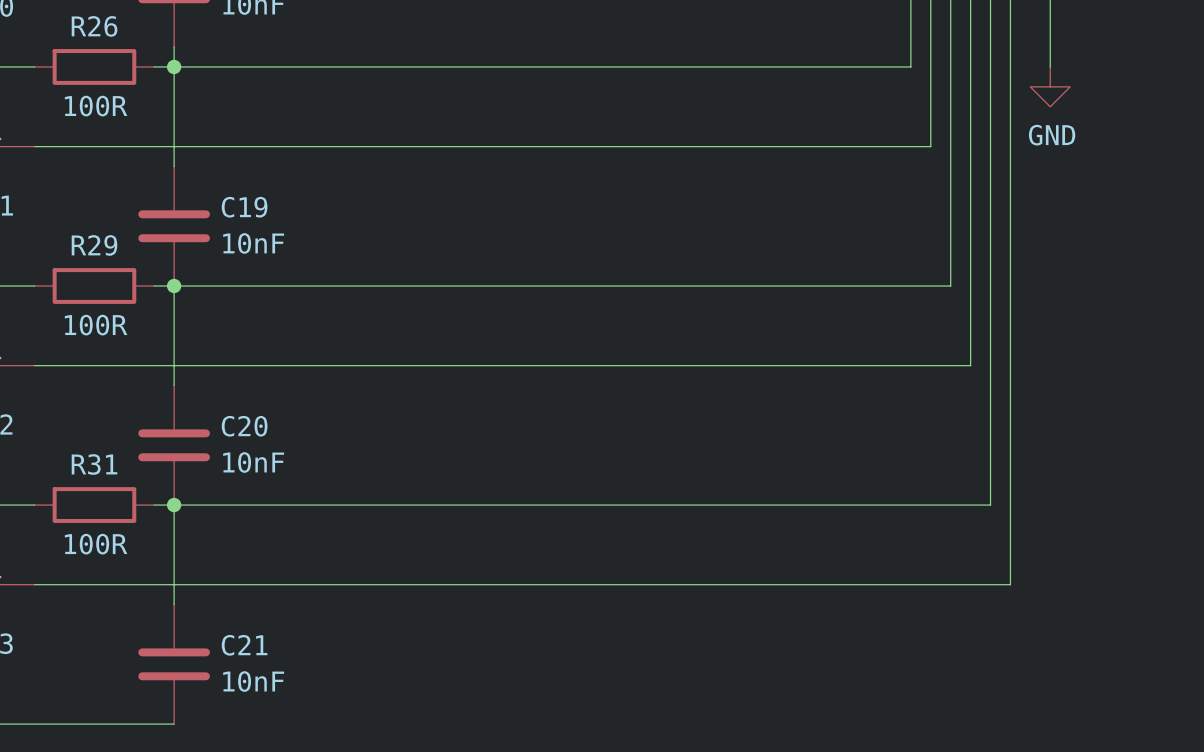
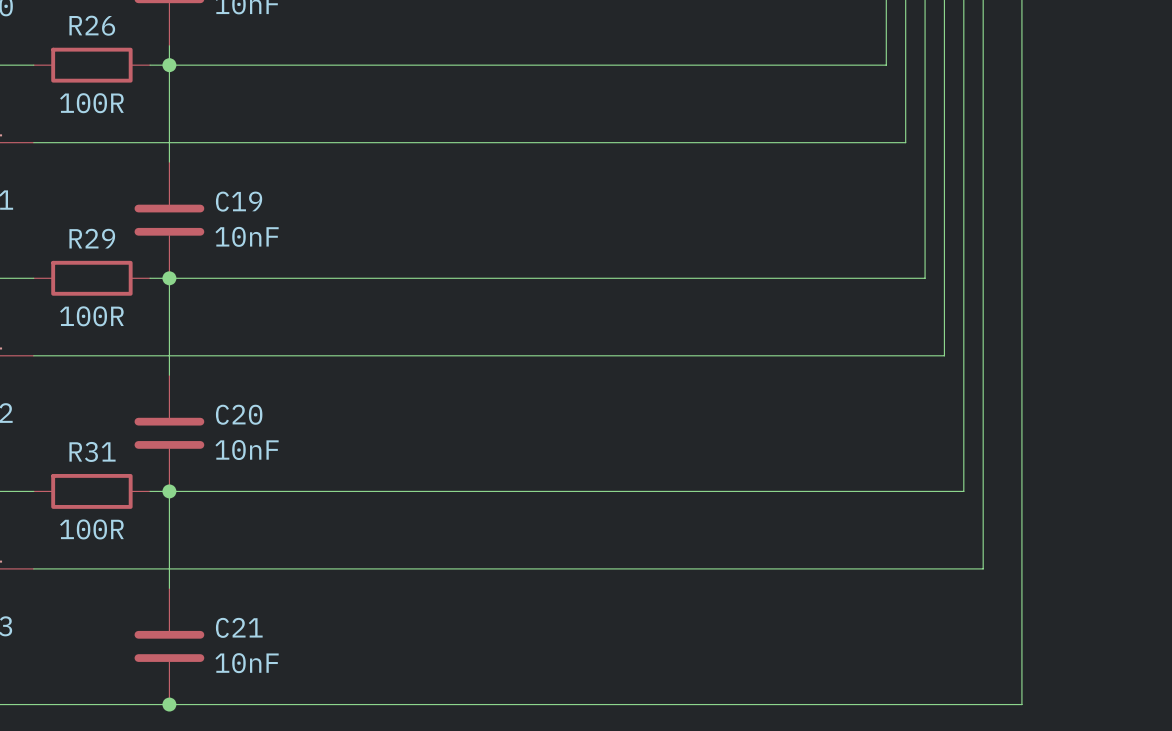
wire: none -> (1021, 65) (1021, 704) (169, 704)
power symbol: GND (1050, 86) -> none
junction: none -> (169, 704)

